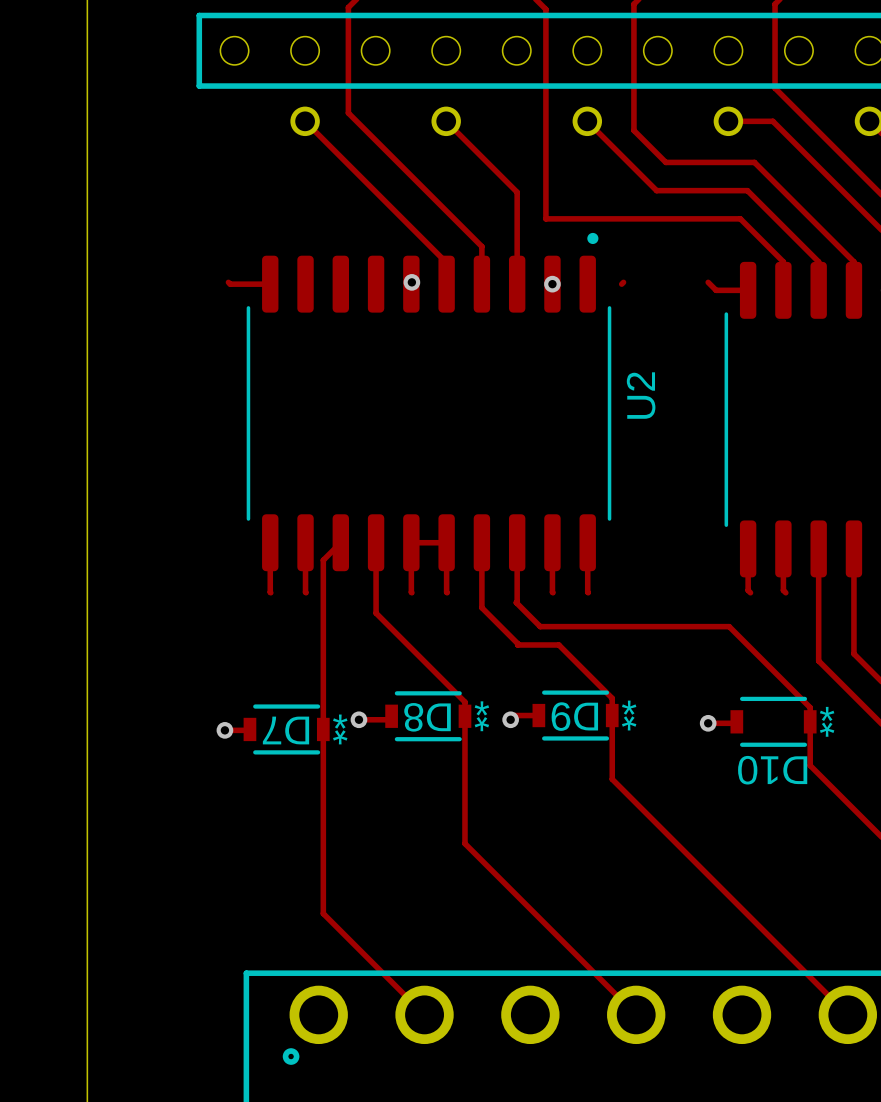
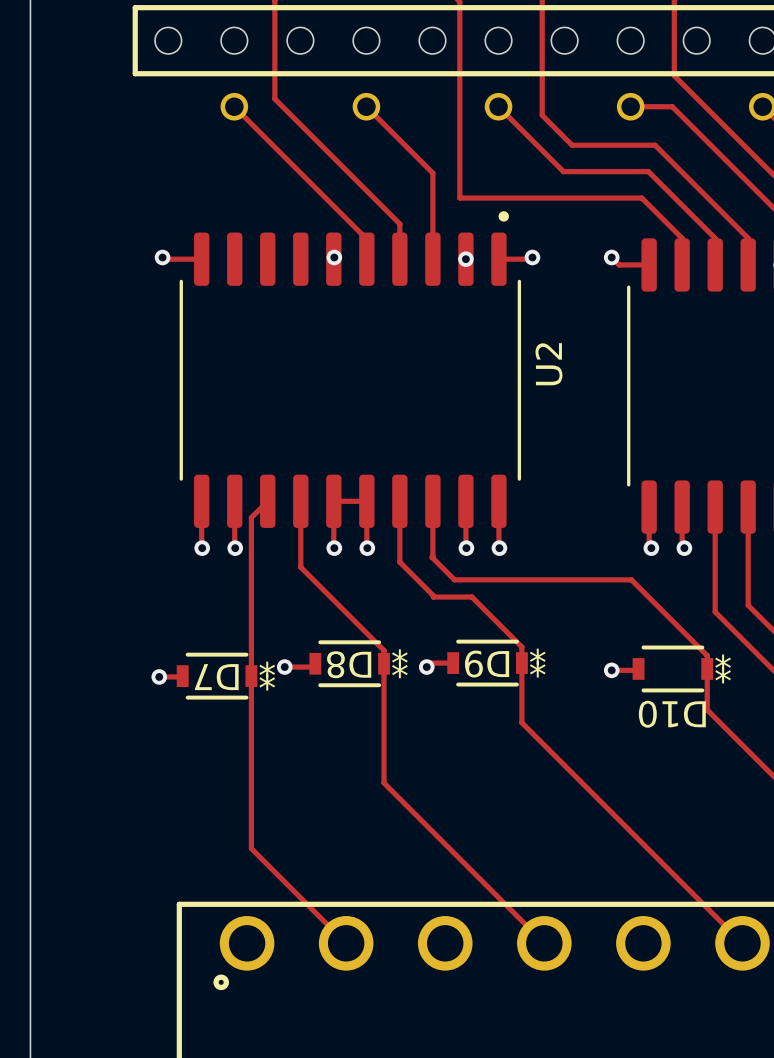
via: none -> (162, 257)
via: none -> (532, 257)
via: none -> (611, 257)
track: none -> (498, 259) (530, 259)
via: none -> (202, 548)
via: none -> (235, 548)
via: none -> (334, 548)
via: none -> (367, 548)
via: none -> (466, 548)
via: none -> (499, 548)
via: none -> (651, 548)
via: none -> (684, 548)

